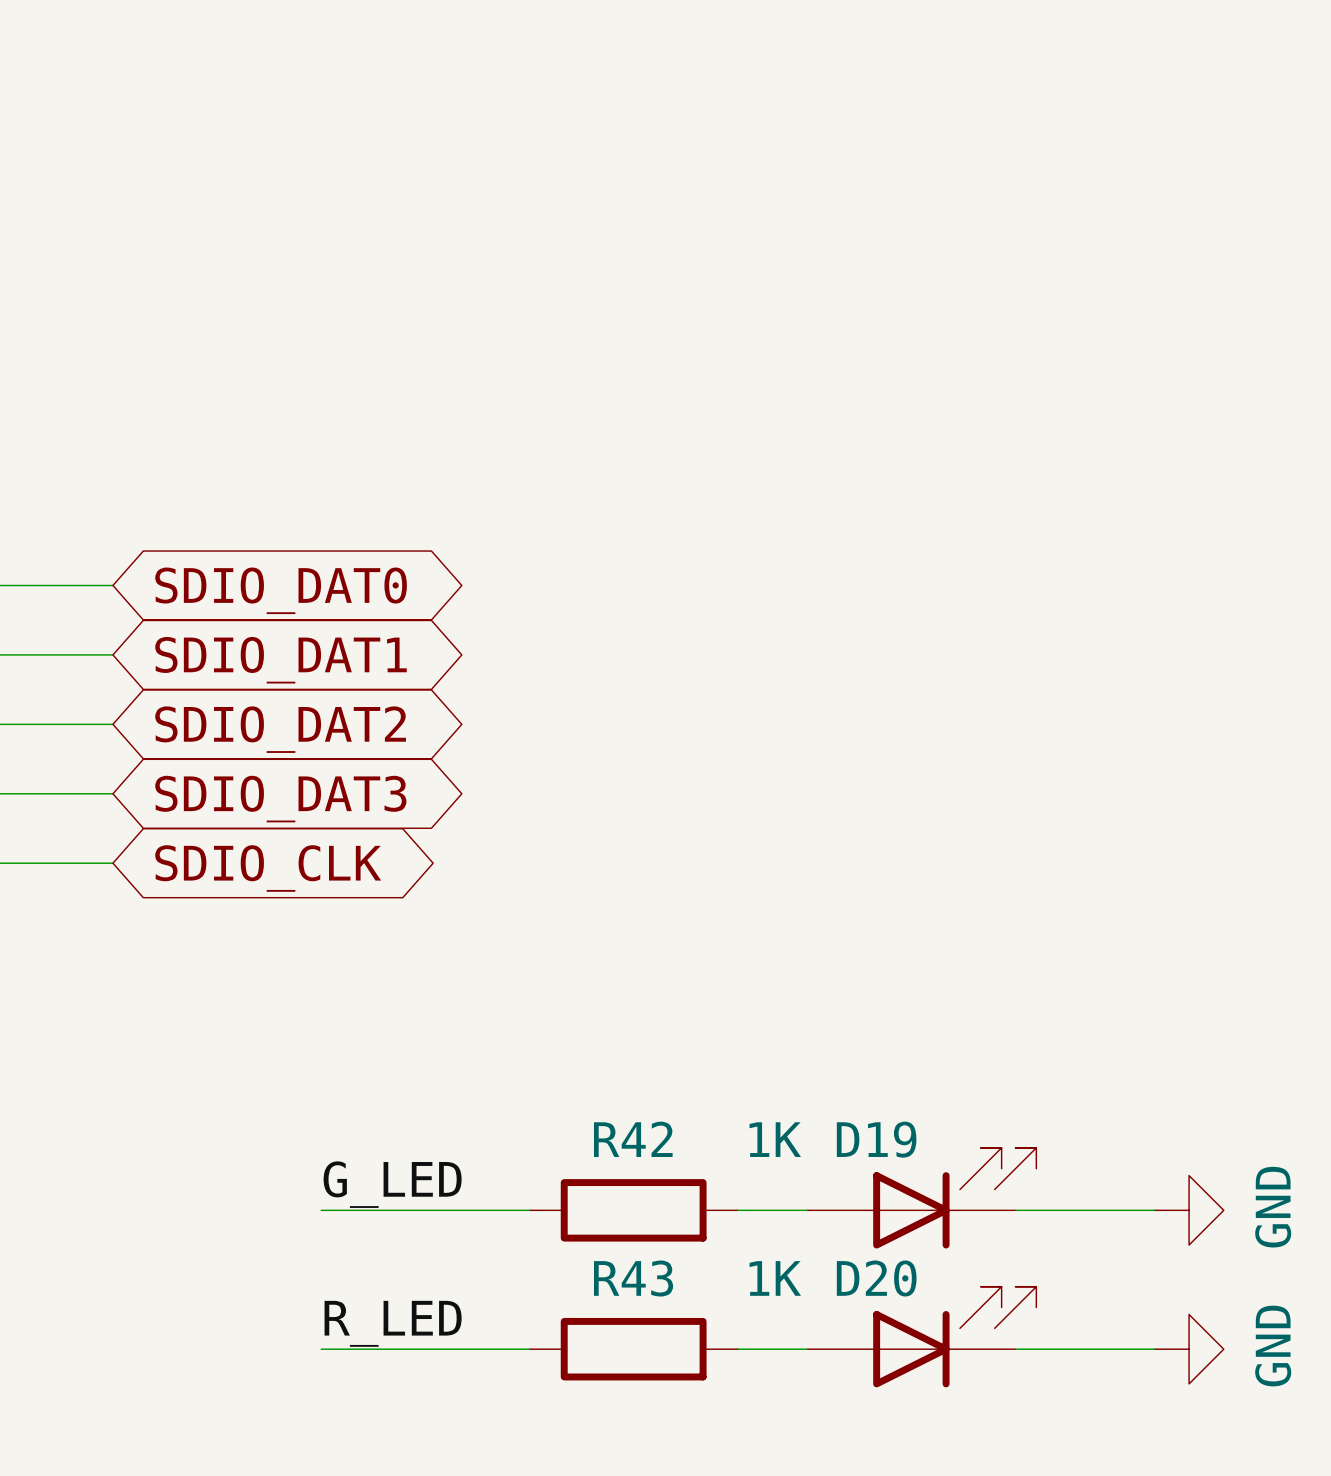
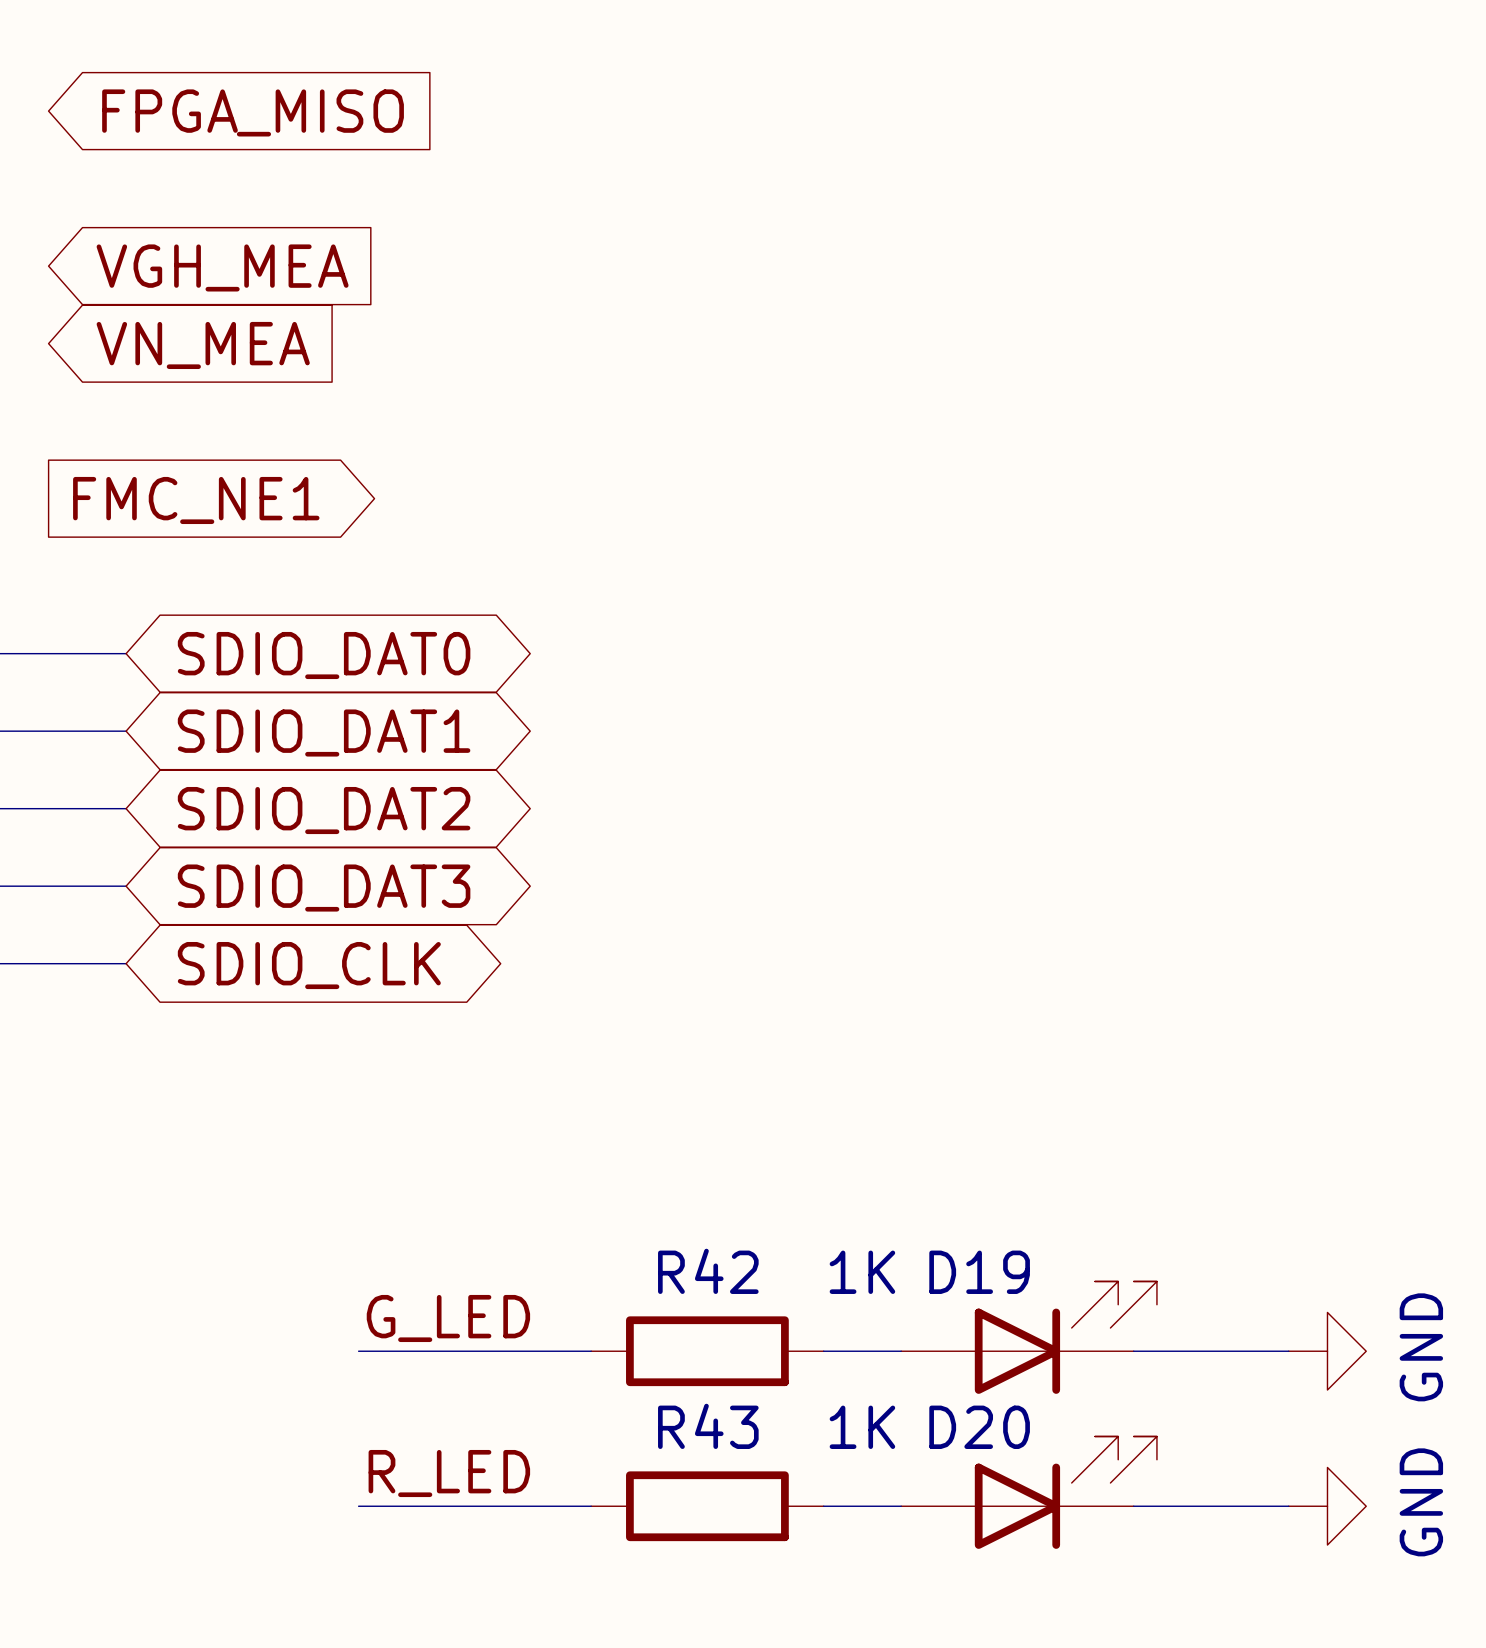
global label: none -> FPGA_MISO (253, 112)
global label: none -> VGH_MEA (222, 267)
global label: none -> VN_MEA (203, 345)
global label: none -> FMC_NE1 (196, 500)

